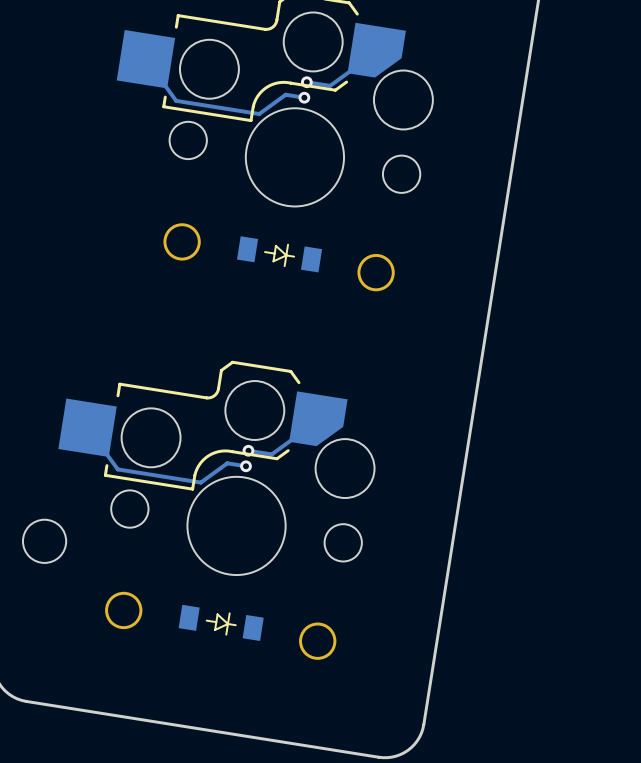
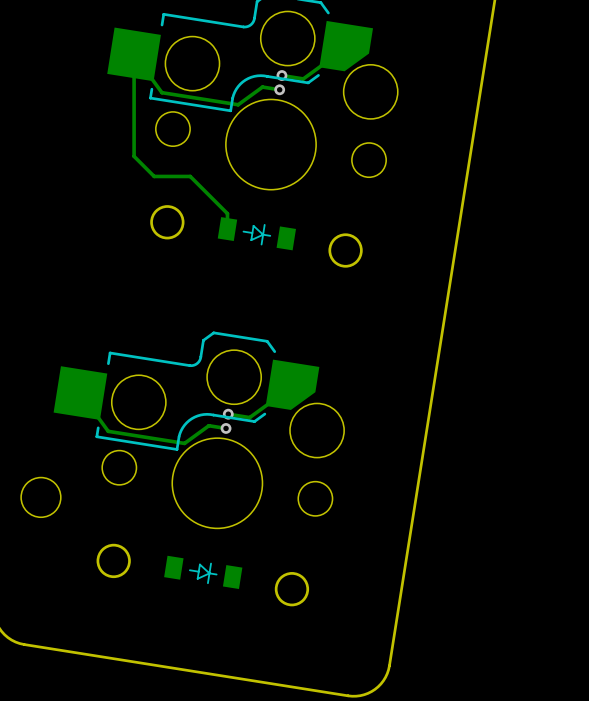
track: none -> (134, 54) (134, 156) (154, 176) (190, 176) (227, 213) (227, 229)

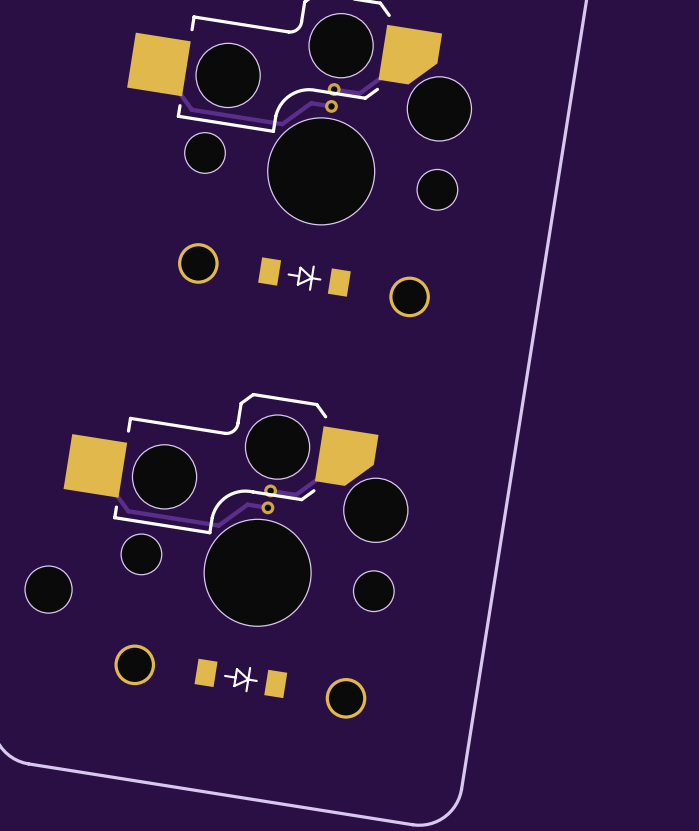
track: (134, 54) (134, 156) (154, 176) (190, 176) (227, 213) (227, 229) -> none

